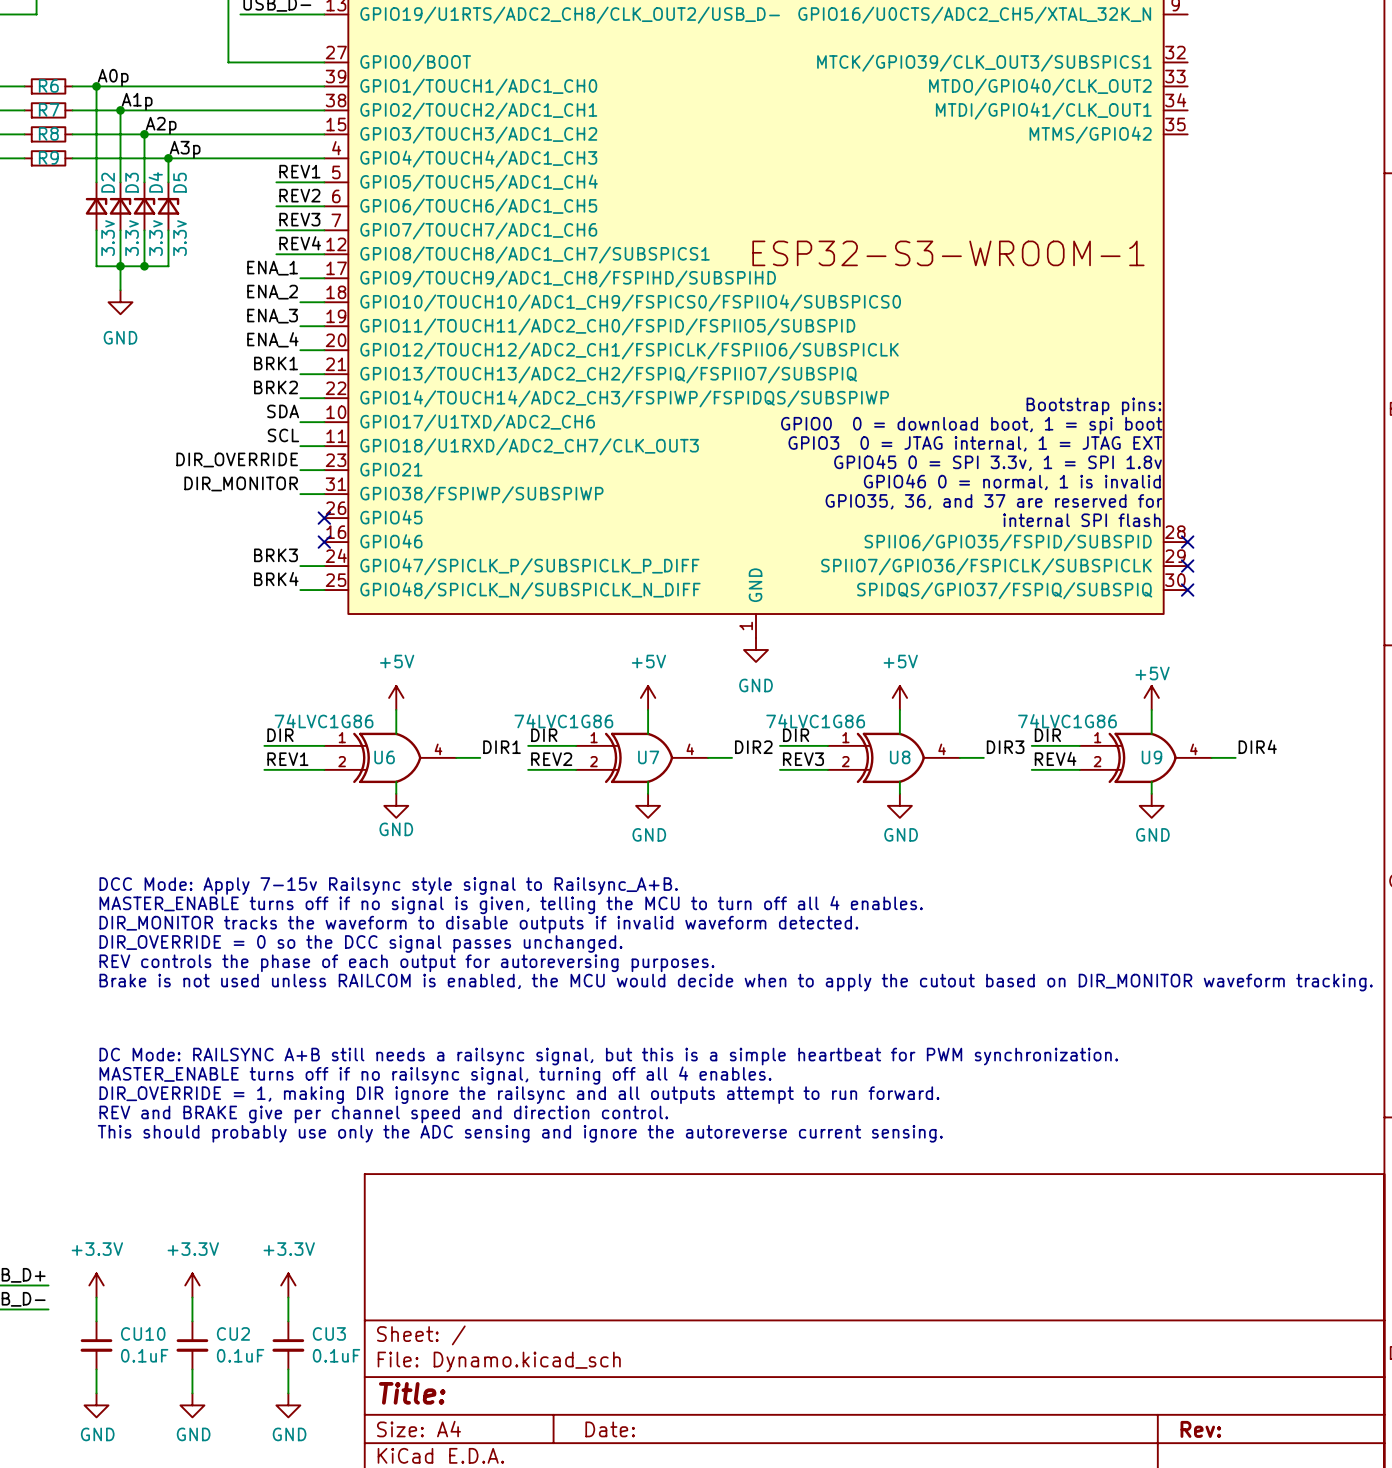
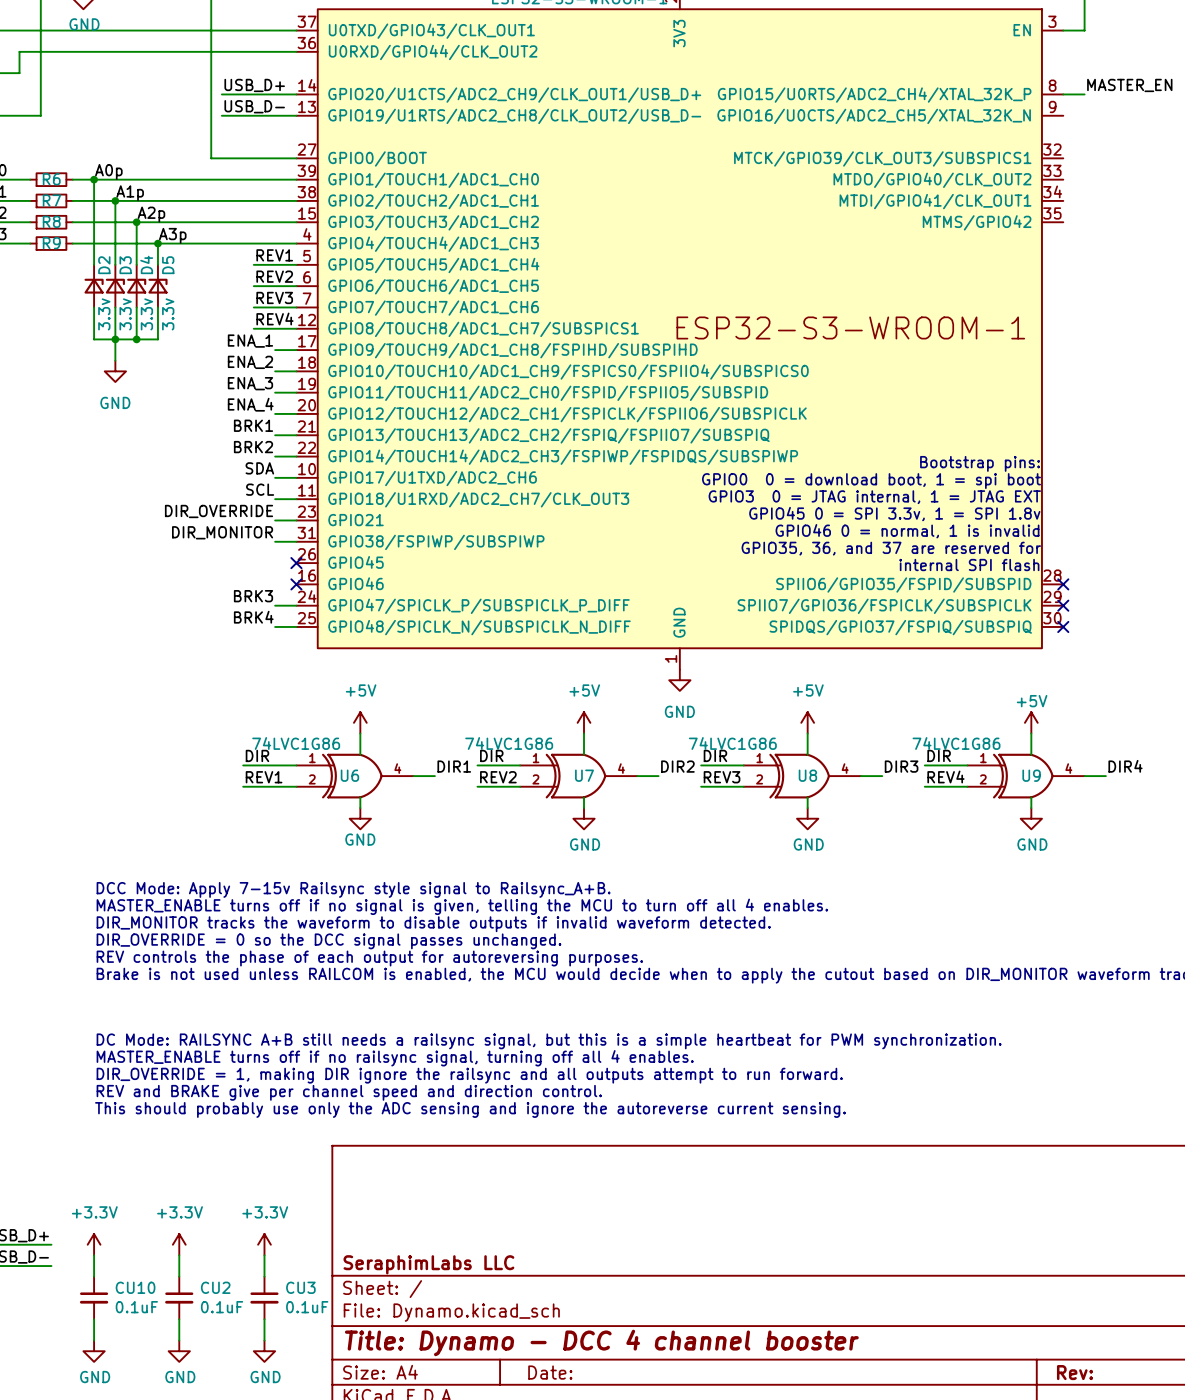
title block: none -> SeraphimLabs LLC (428, 1264)
title block: Title: (412, 1393) -> Title: Dynamo - DCC 4 channel booster (601, 1342)

